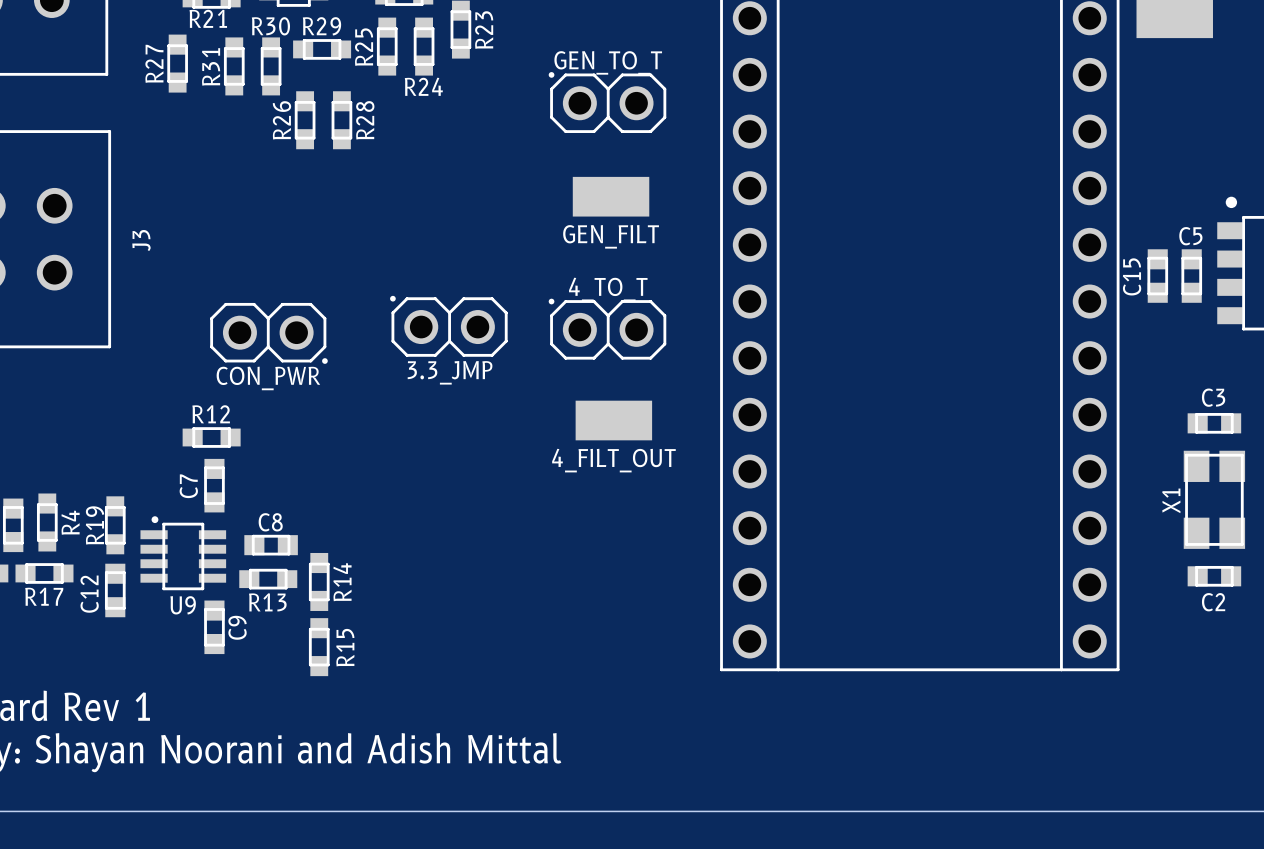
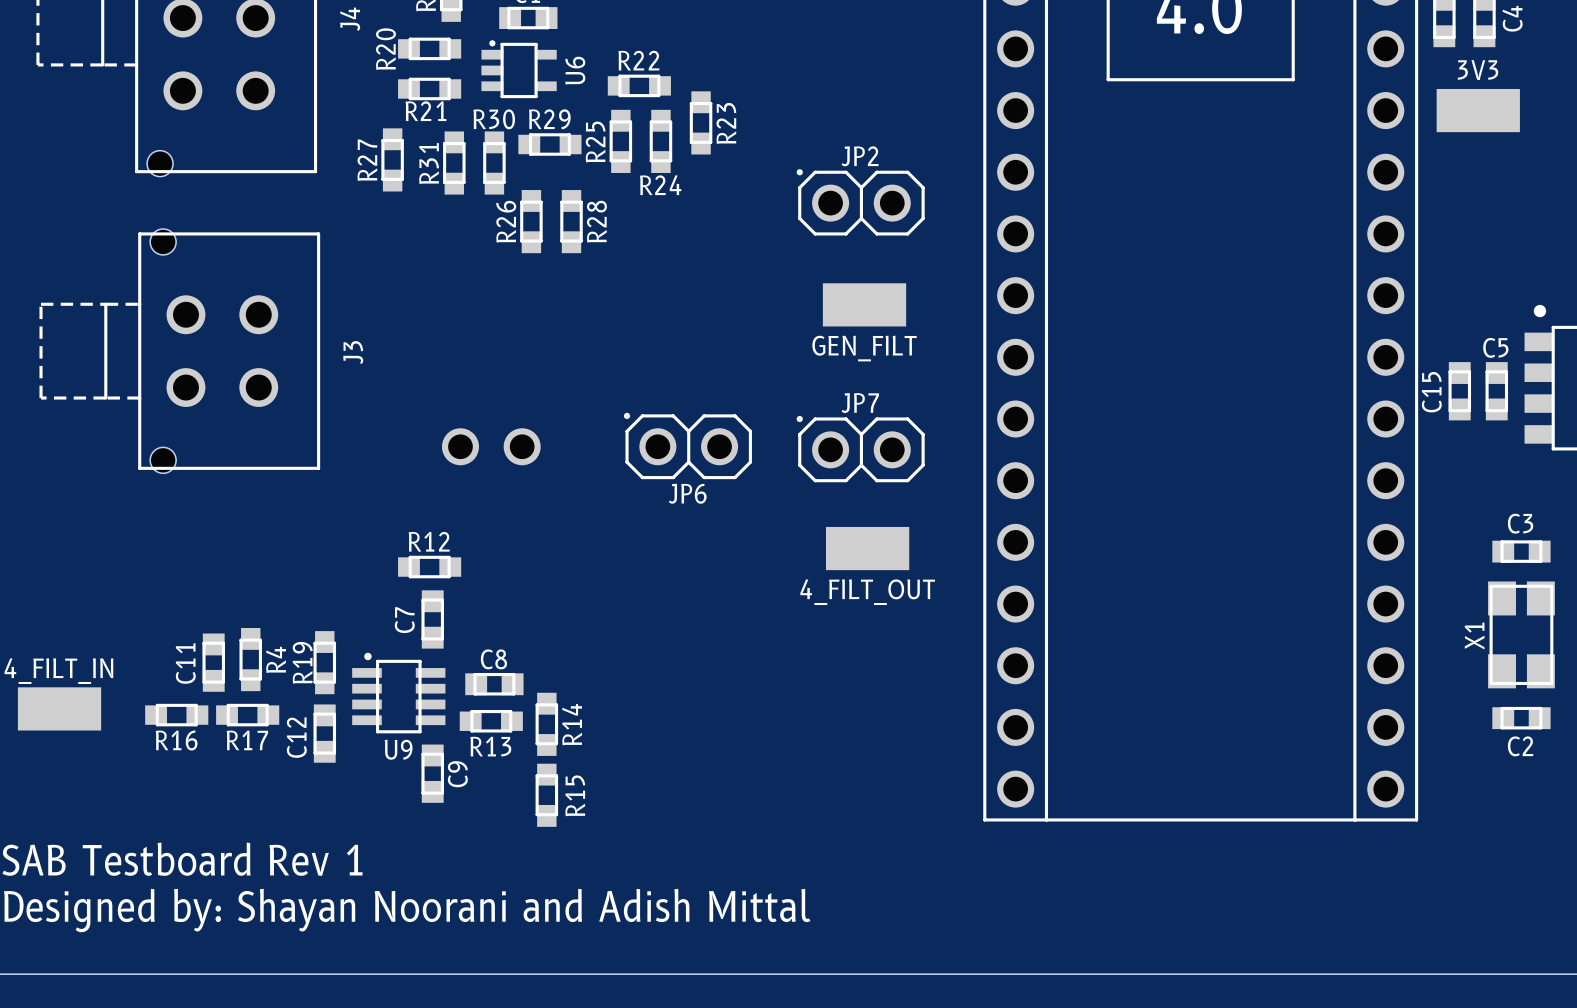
GEN_TO_T name: GEN_TO_T (608, 62) -> JP2 (860, 156)
4_TO_T name: 4_TO_T (608, 289) -> JP7 (860, 403)
part: none -> (491, 446)
CON_PWR: (268, 333) -> none
3.3_JMP name: 3.3_JMP (450, 372) -> JP6 (687, 493)

